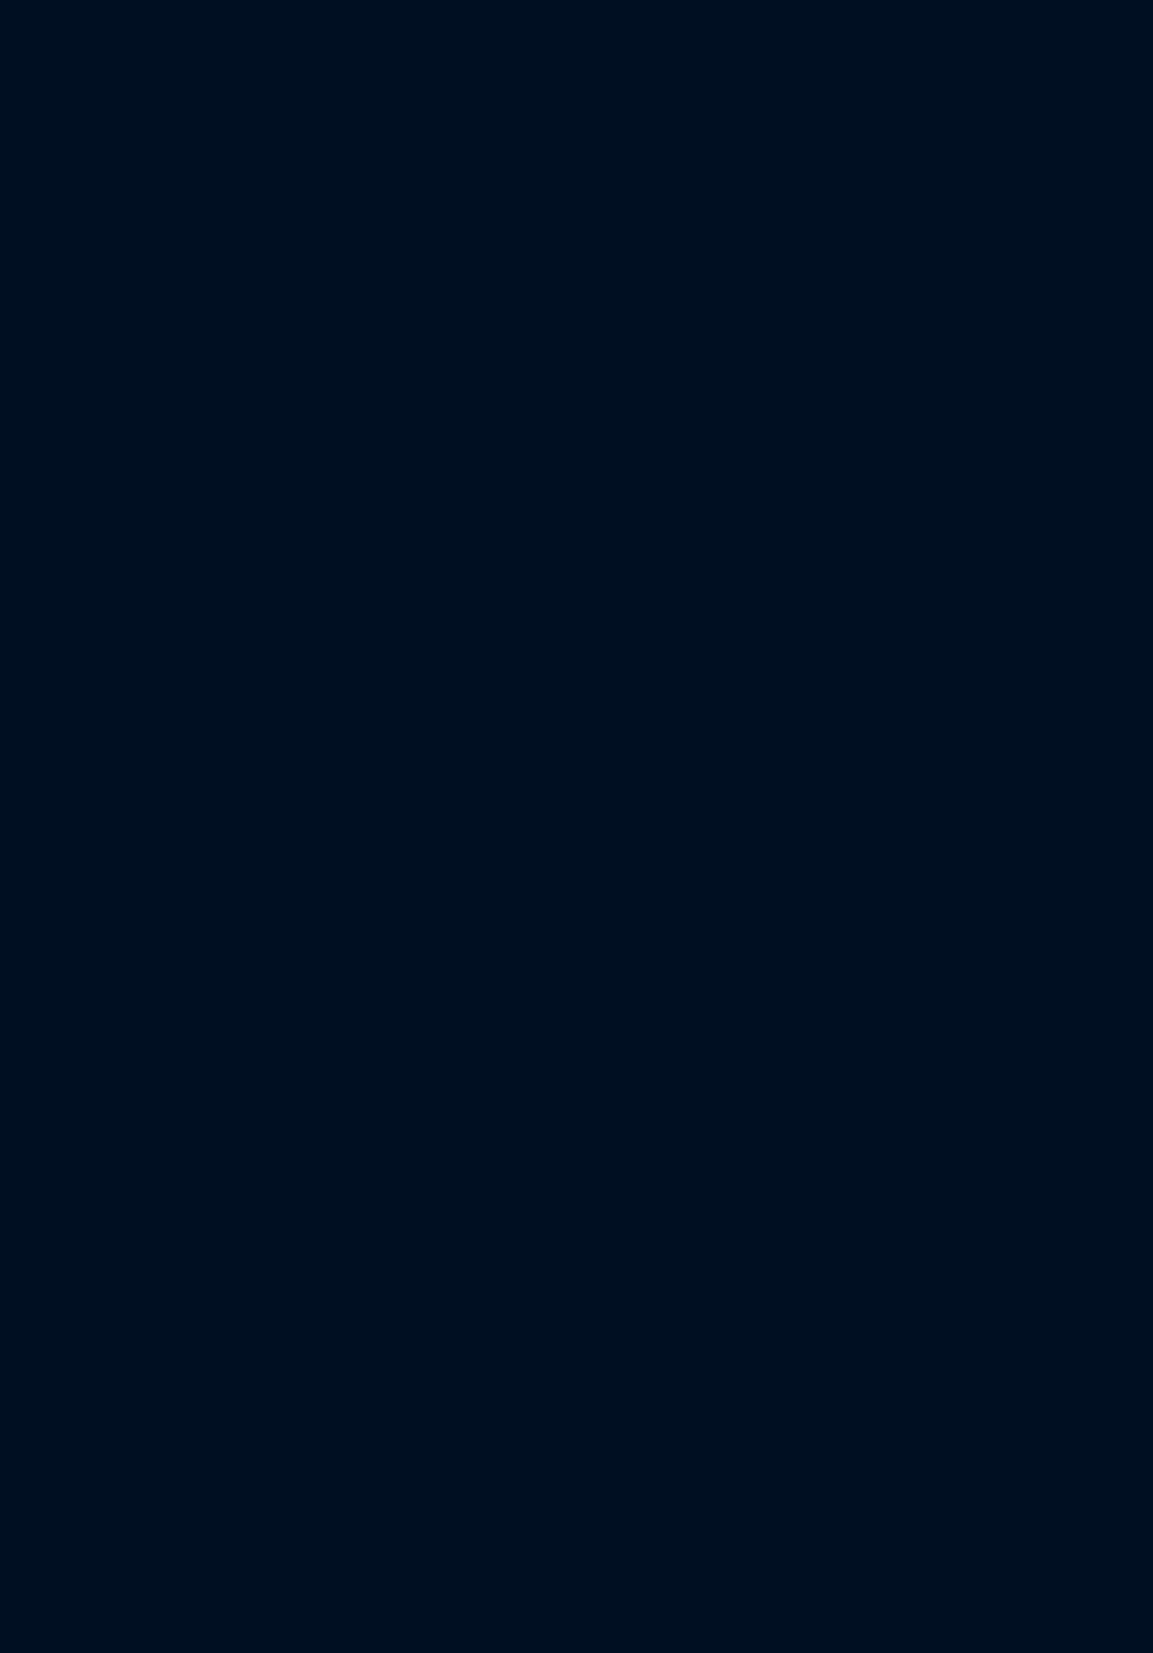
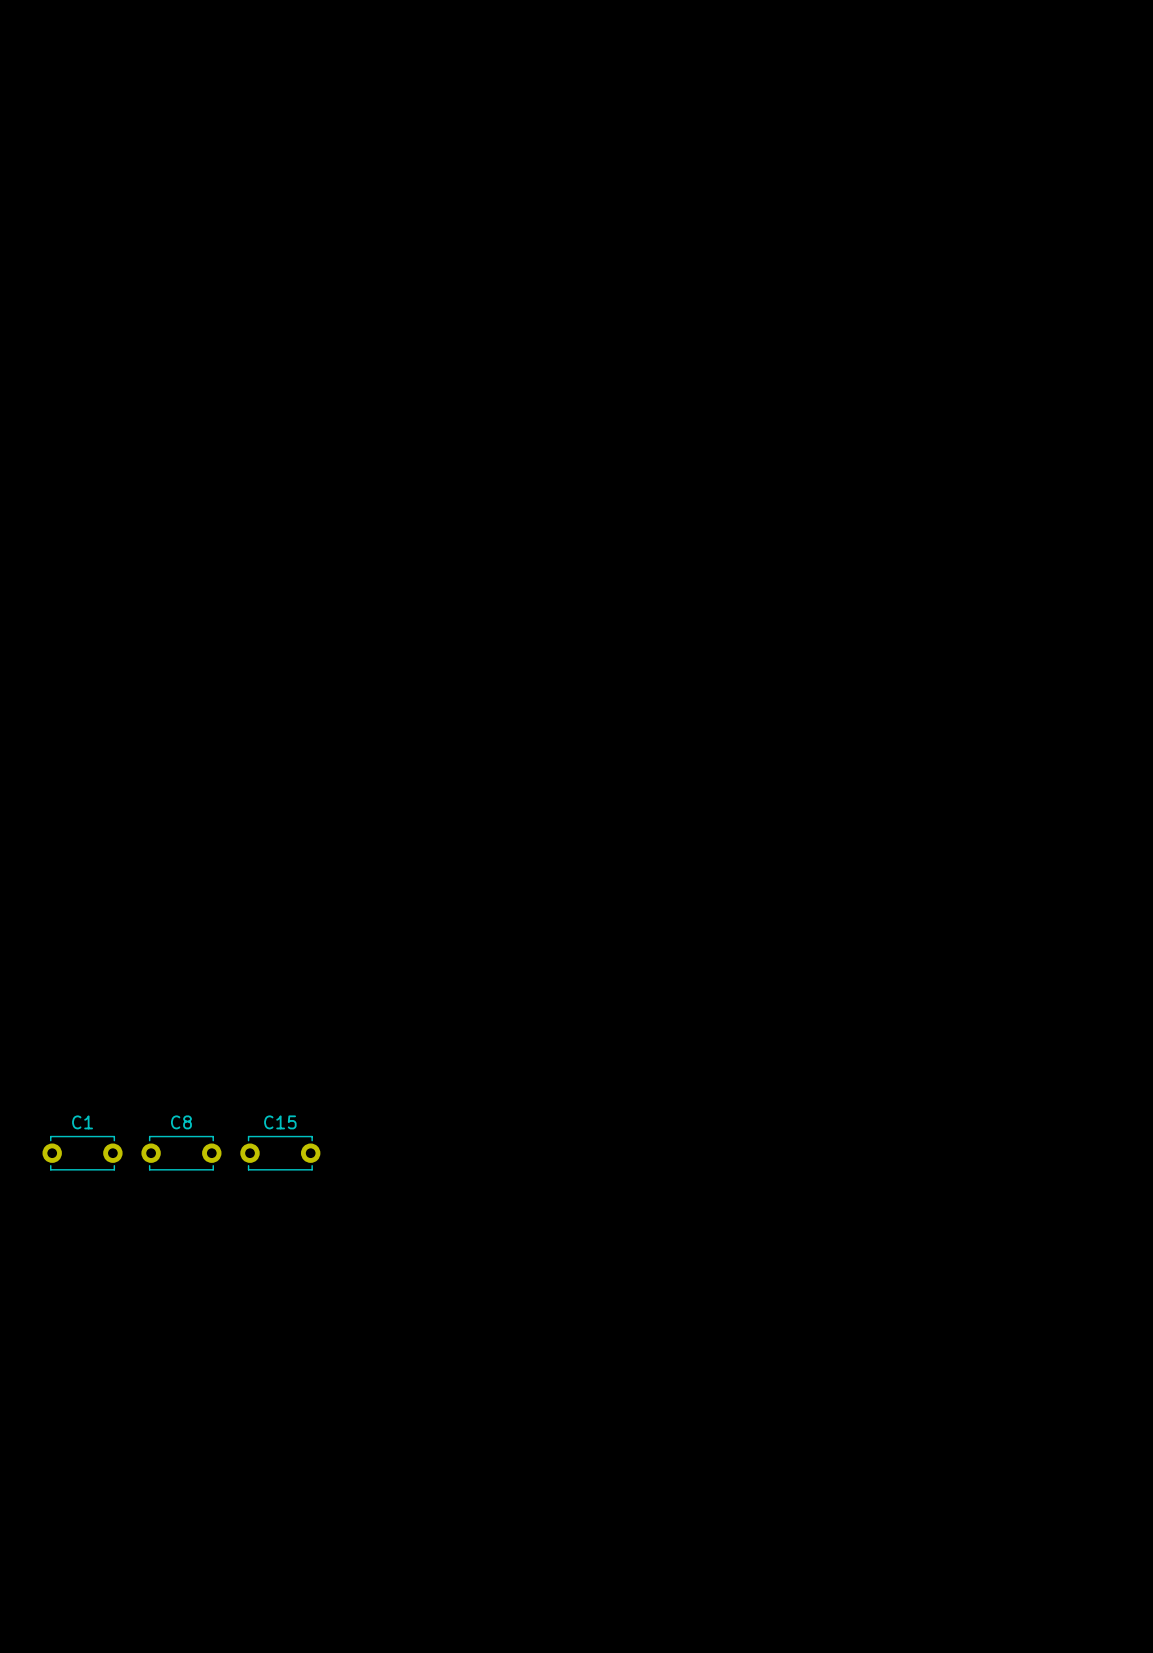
C1: none -> (82, 1153)
C8: none -> (181, 1153)
C15: none -> (280, 1153)

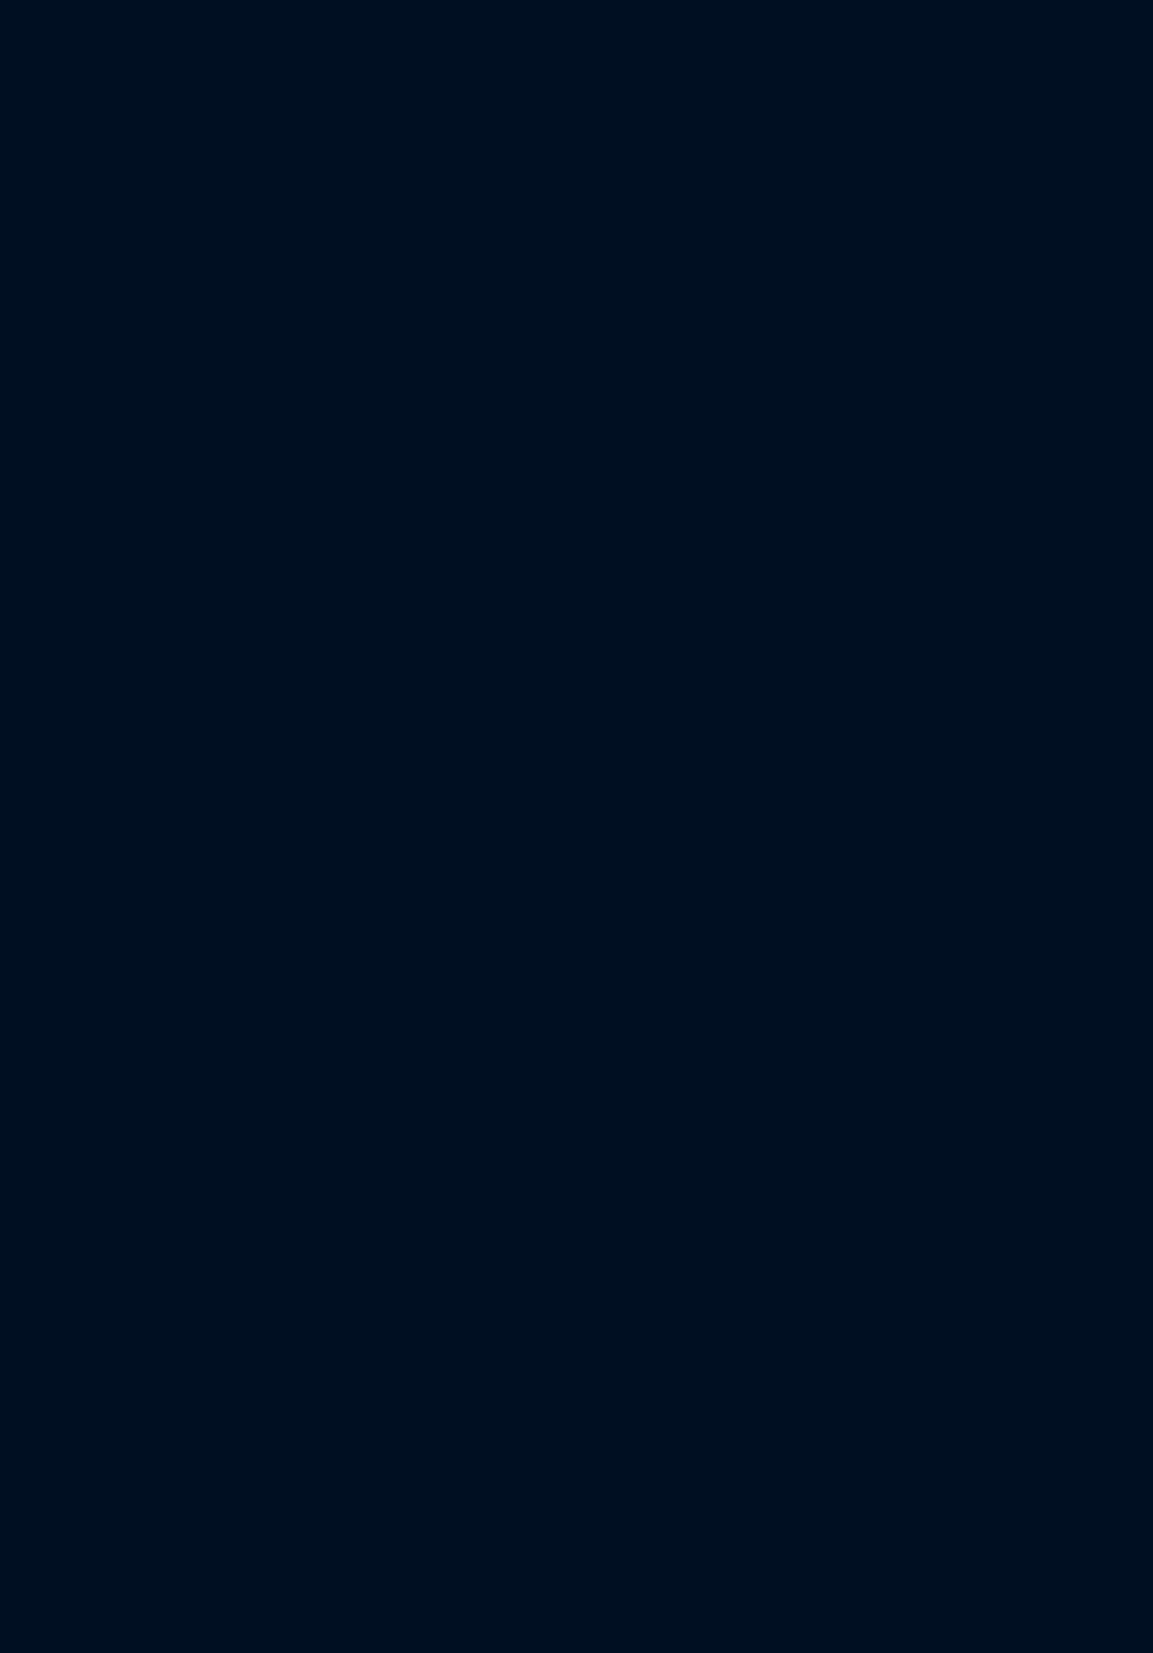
C1: (82, 1153) -> none
C8: (181, 1153) -> none
C15: (280, 1153) -> none

